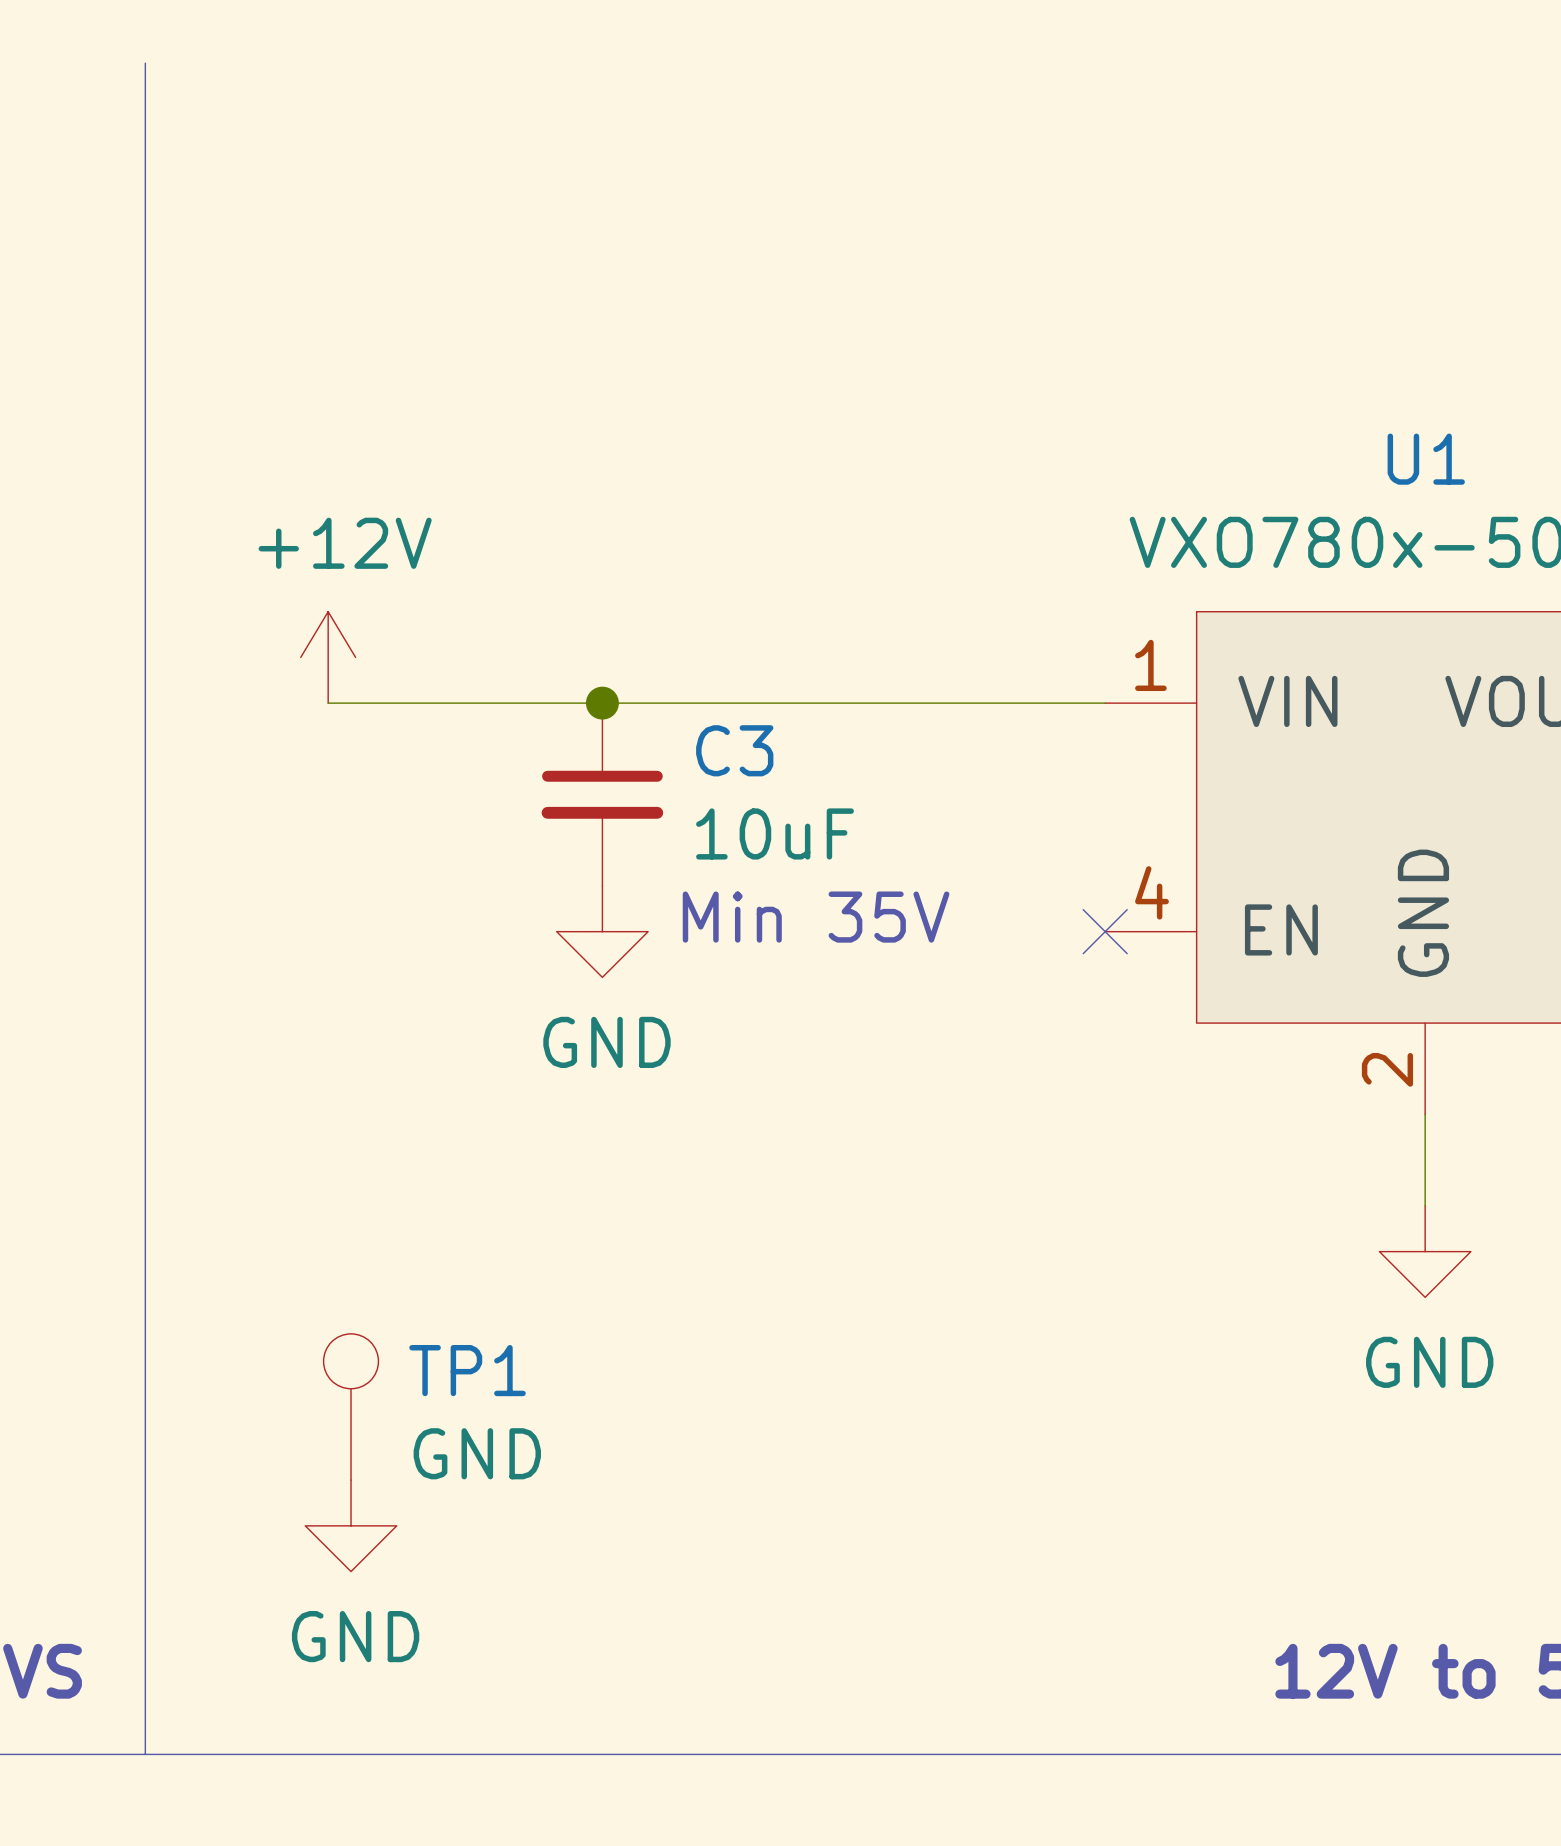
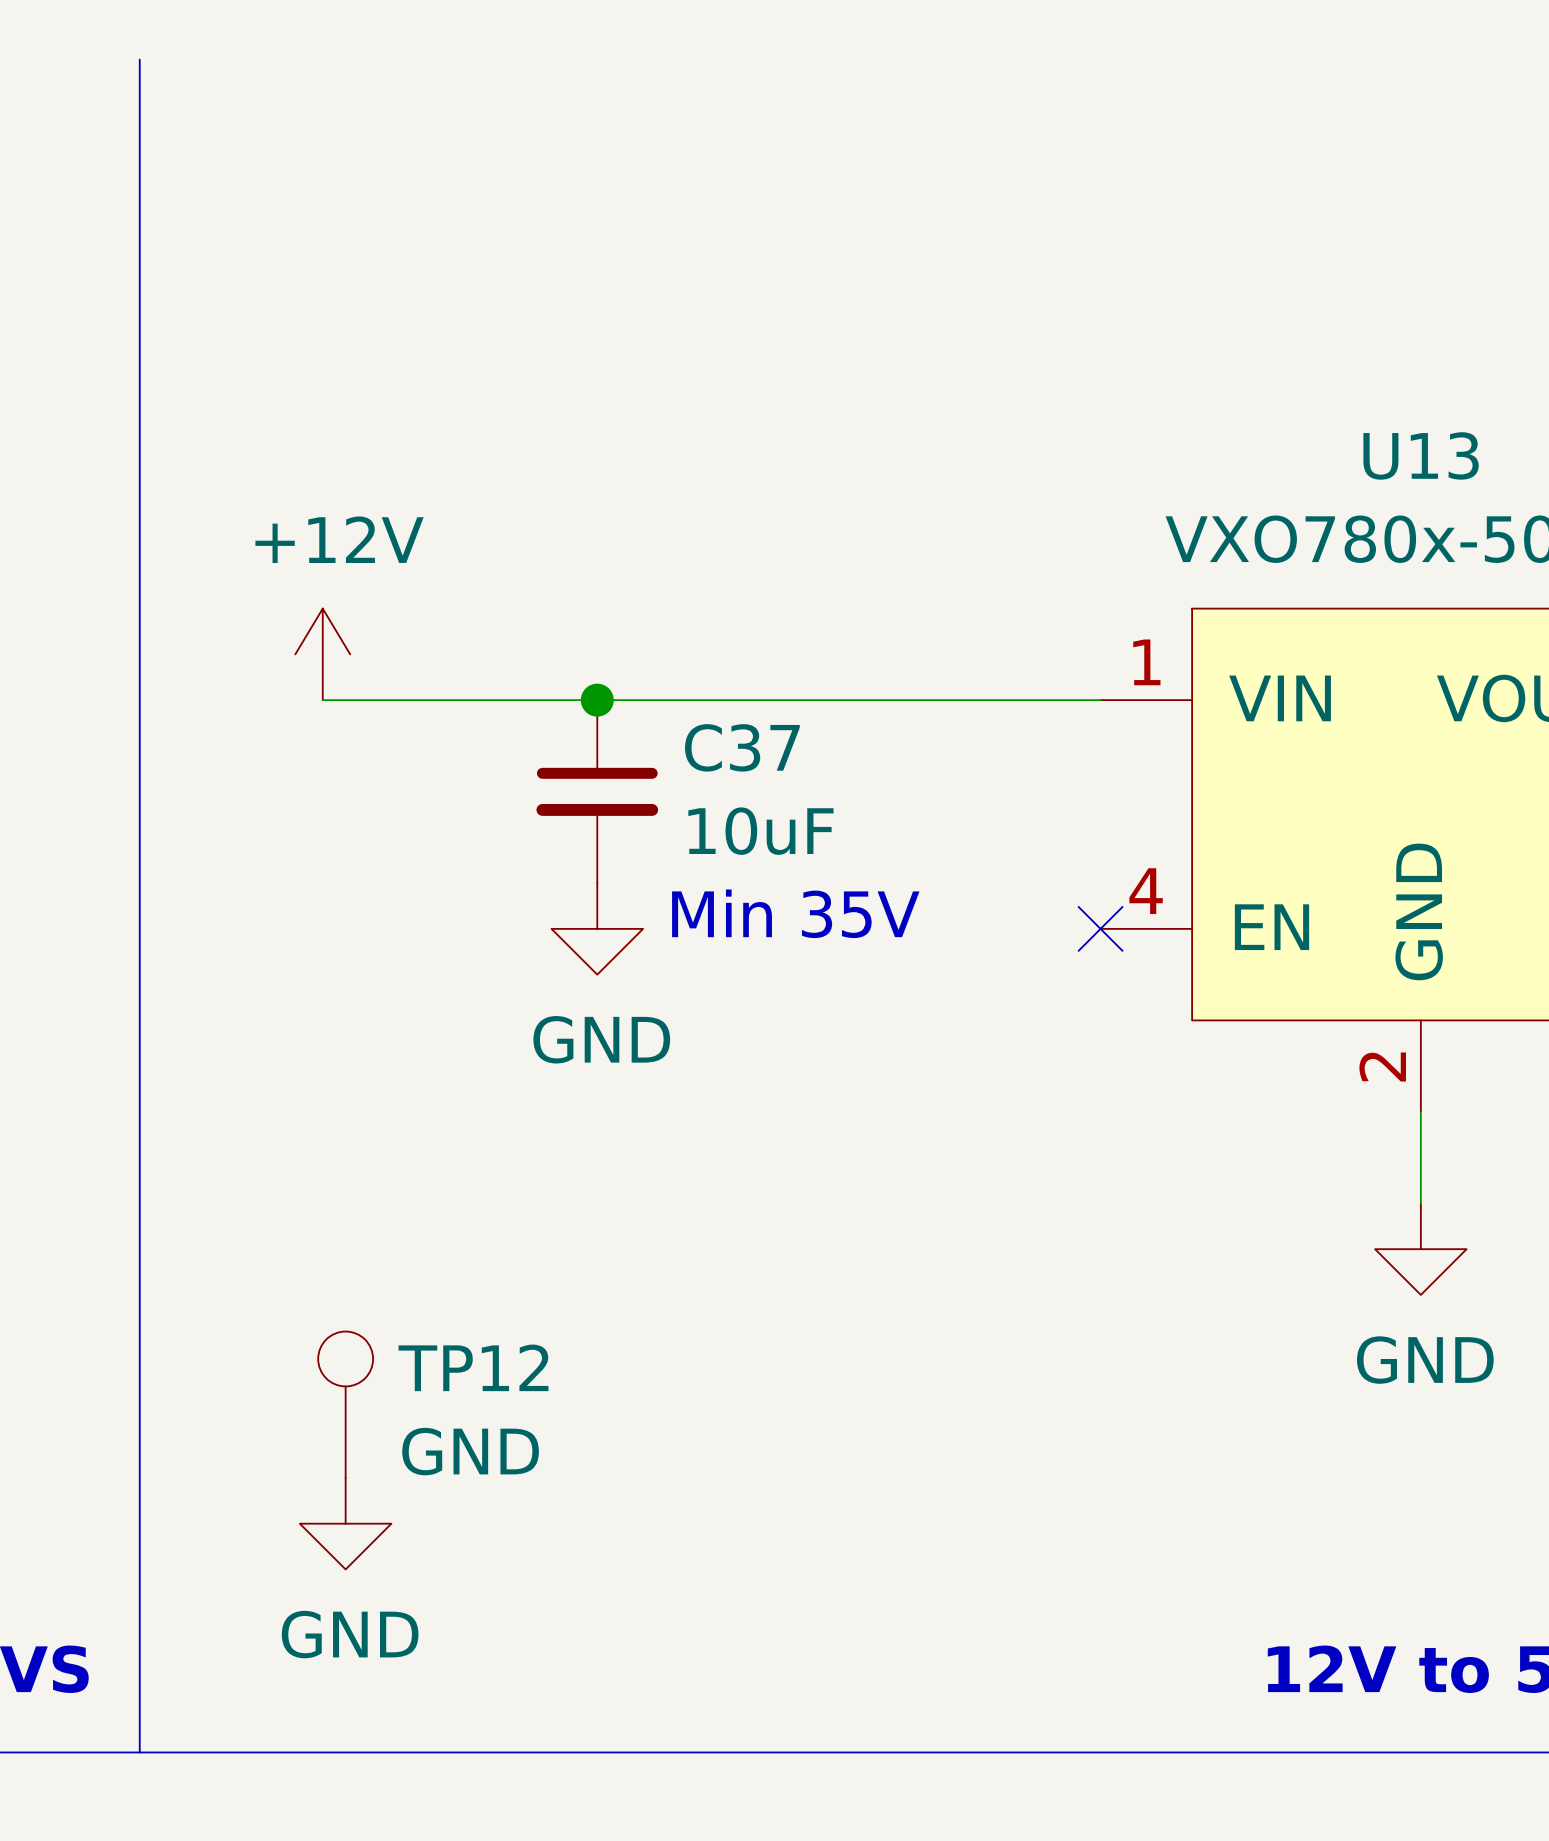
U1 name: U1 (1426, 459) -> U13 (1421, 455)
C3 name: C3 (734, 750) -> C37 (742, 747)
TP1 name: TP1 (467, 1370) -> TP12 (473, 1367)

